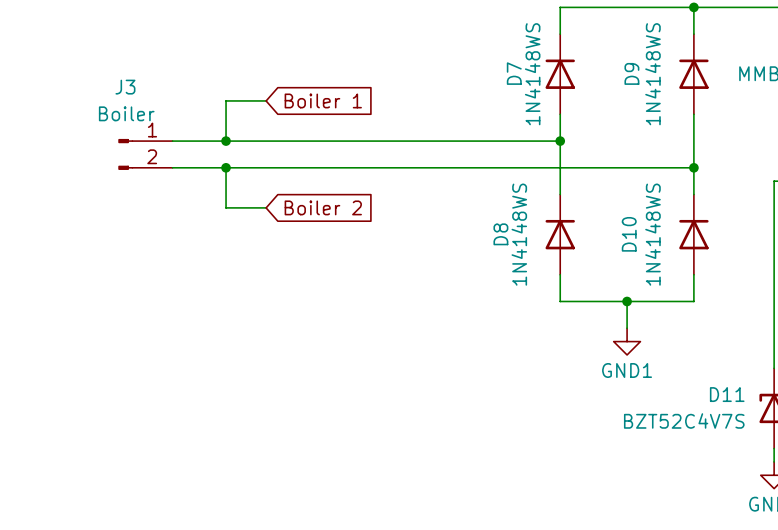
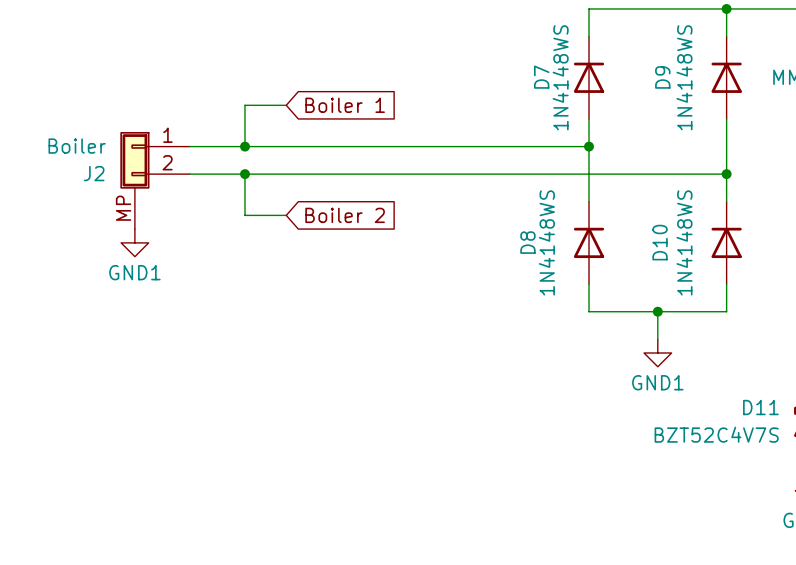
J3: Boiler (145, 154) -> none
J2: none -> Boiler (155, 180)
power symbol: none -> GND1 (134, 242)

